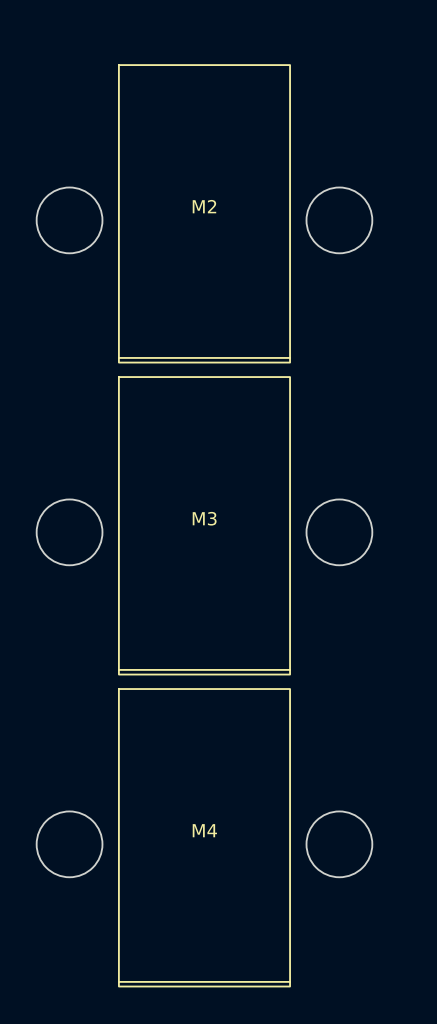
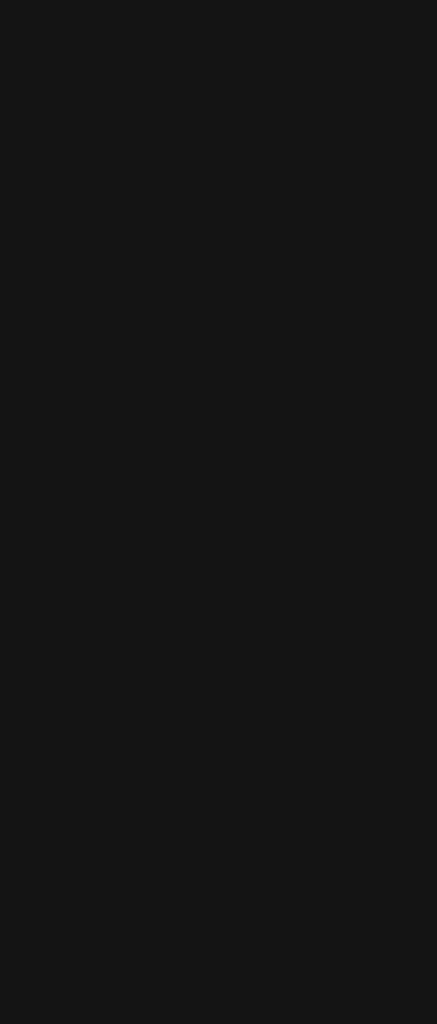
M2: (204, 213) -> none
M3: (204, 525) -> none
M4: (204, 837) -> none

